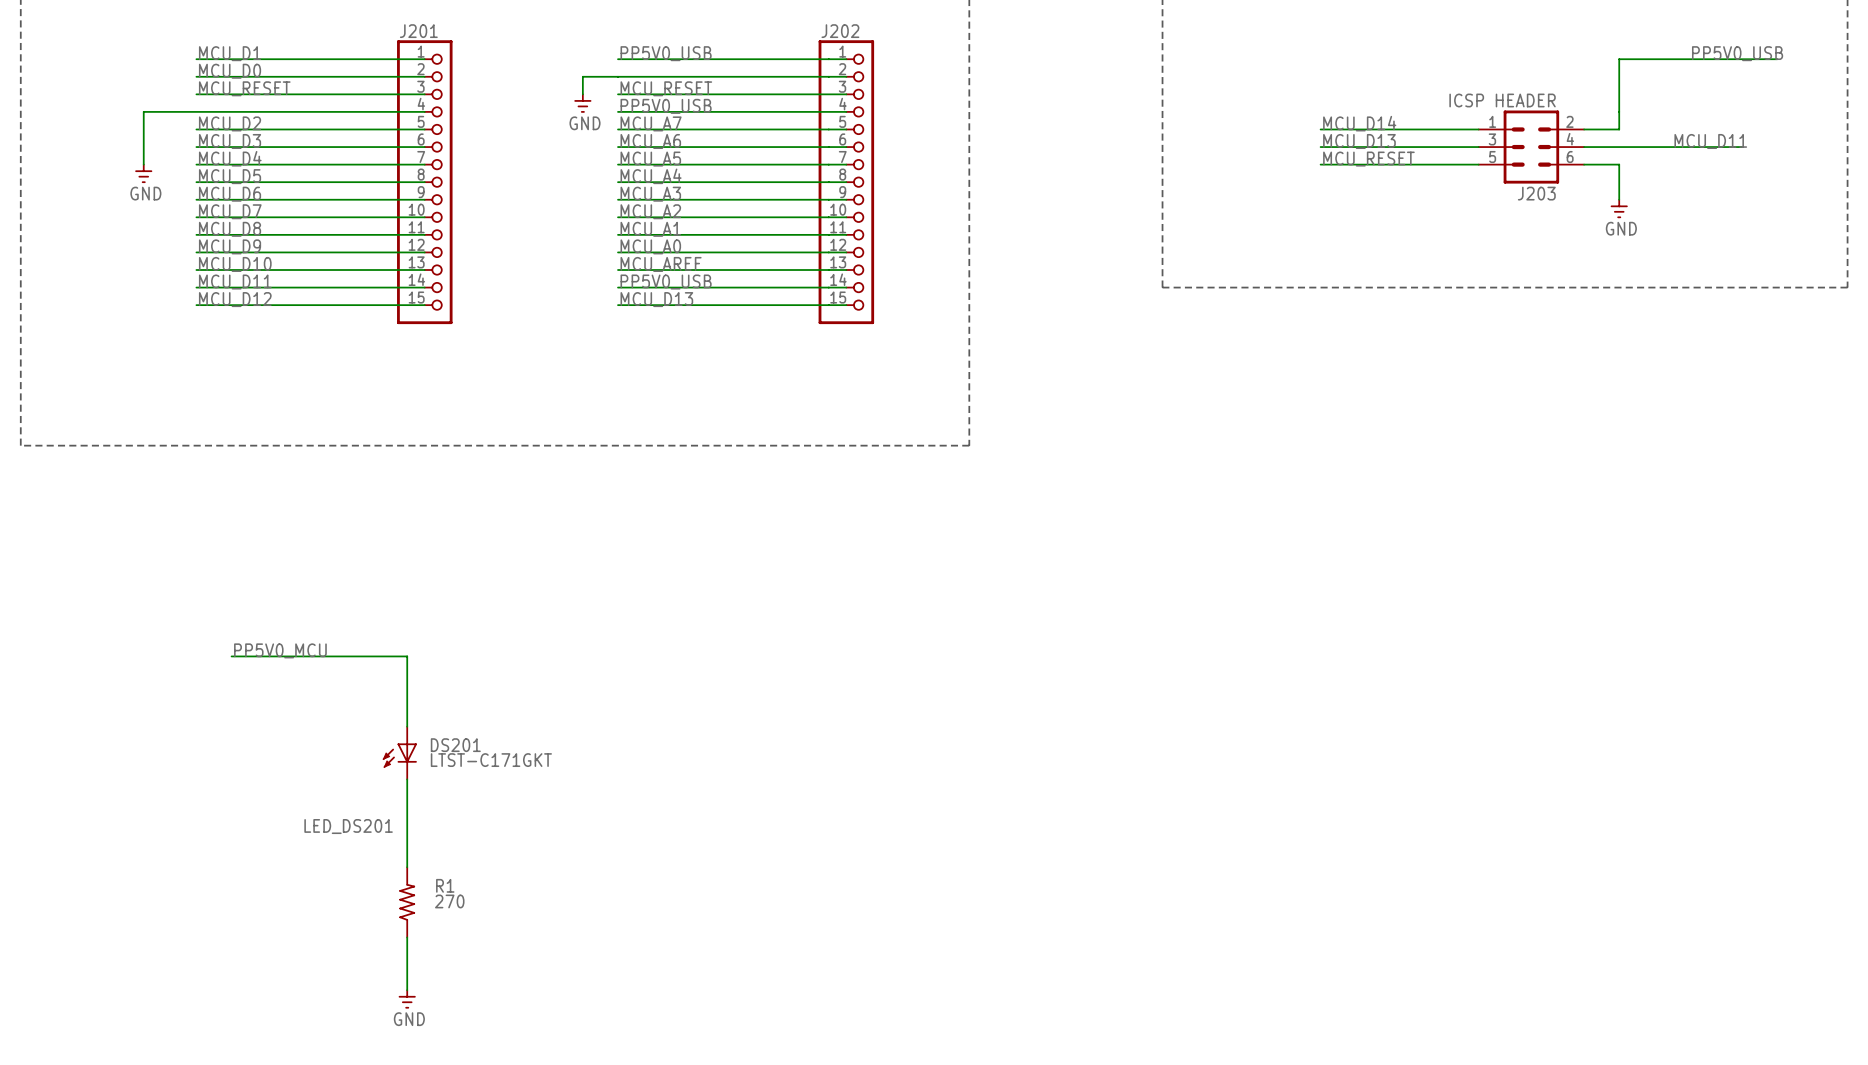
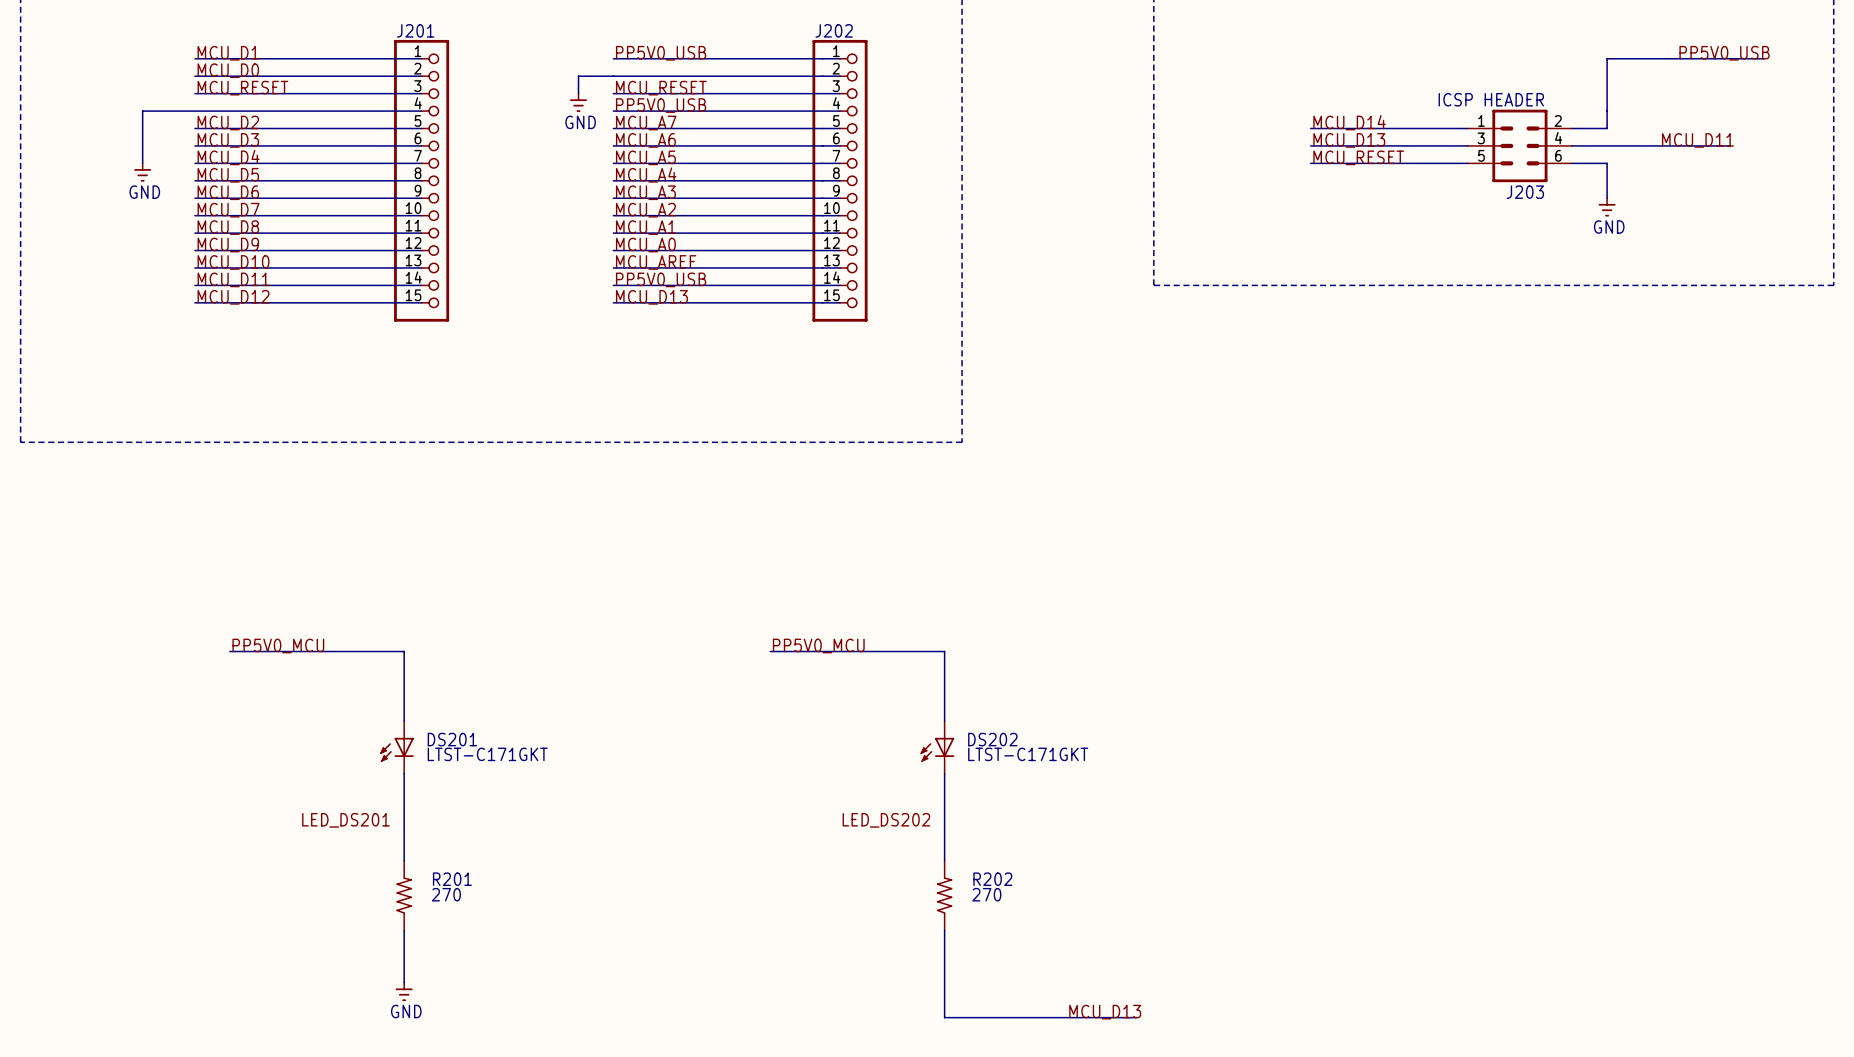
label: none -> PP5V0_MCU (818, 646)
wire: none -> (770, 651) (944, 651) (944, 721)
DS202: none -> LTST-C171GKT (937, 747)
wire: none -> (944, 773) (944, 860)
label: none -> LED_DS202 (886, 820)
R1 name: R1 (445, 885) -> R201 (452, 879)
R202: none -> 270 (944, 895)
wire: none -> (944, 930) (944, 1017) (1136, 1017)
label: none -> MCU_D13 (1105, 1012)

